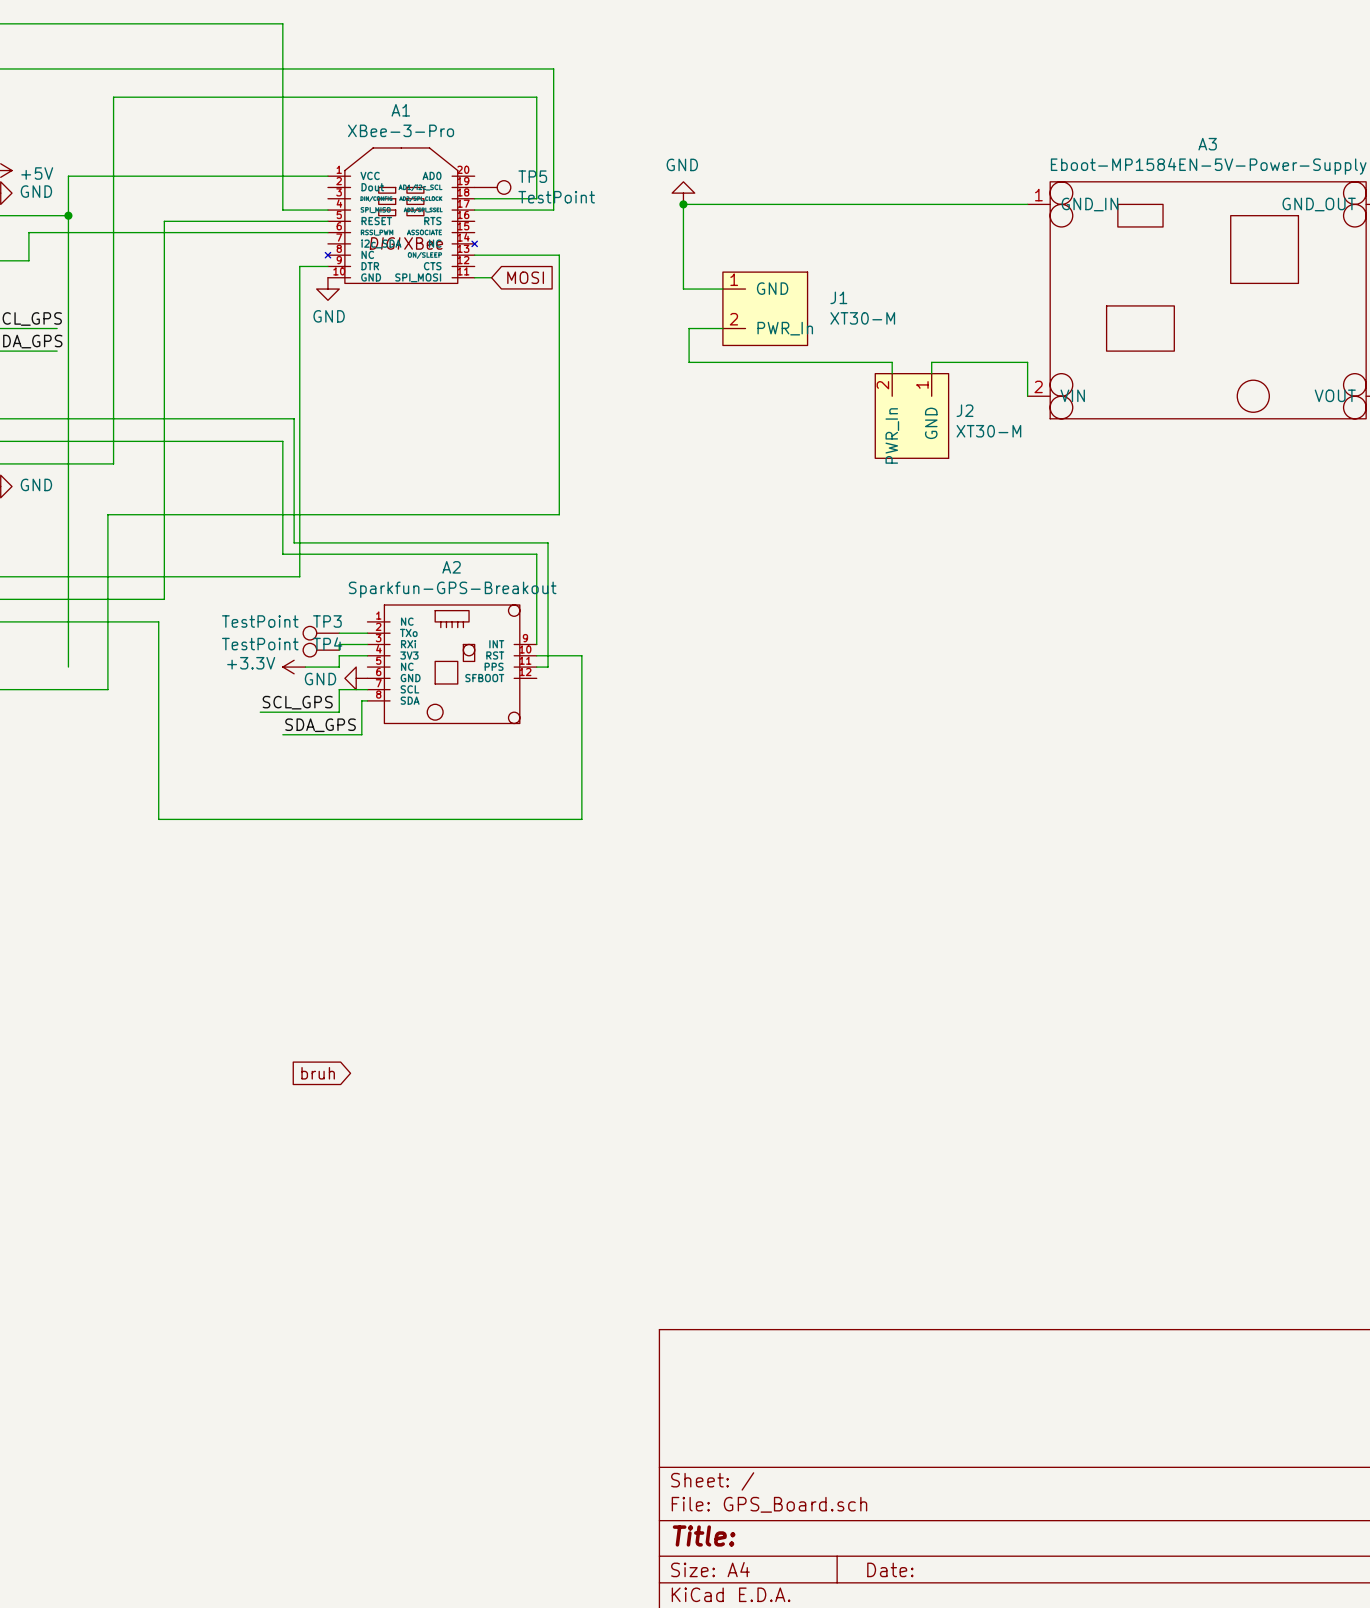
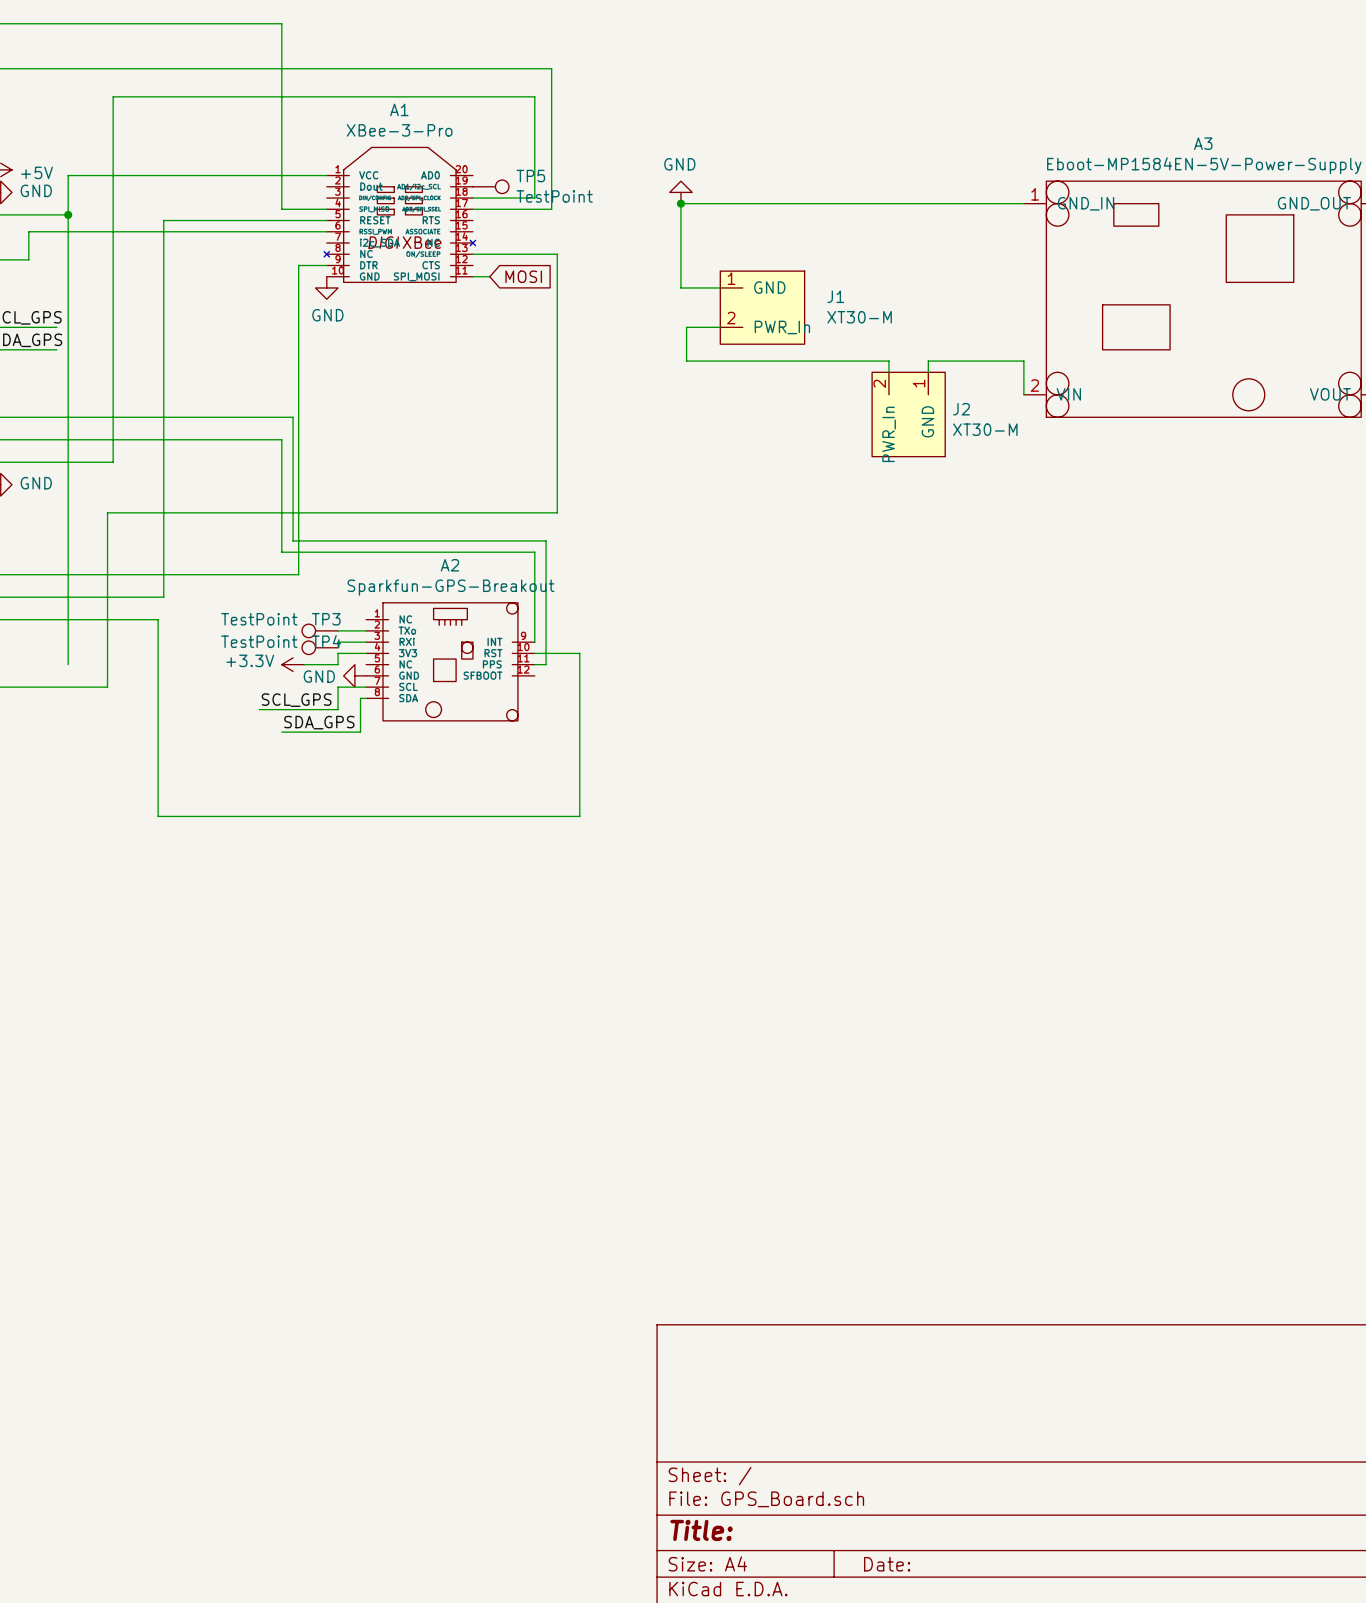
global label: bruh (318, 1073) -> none

